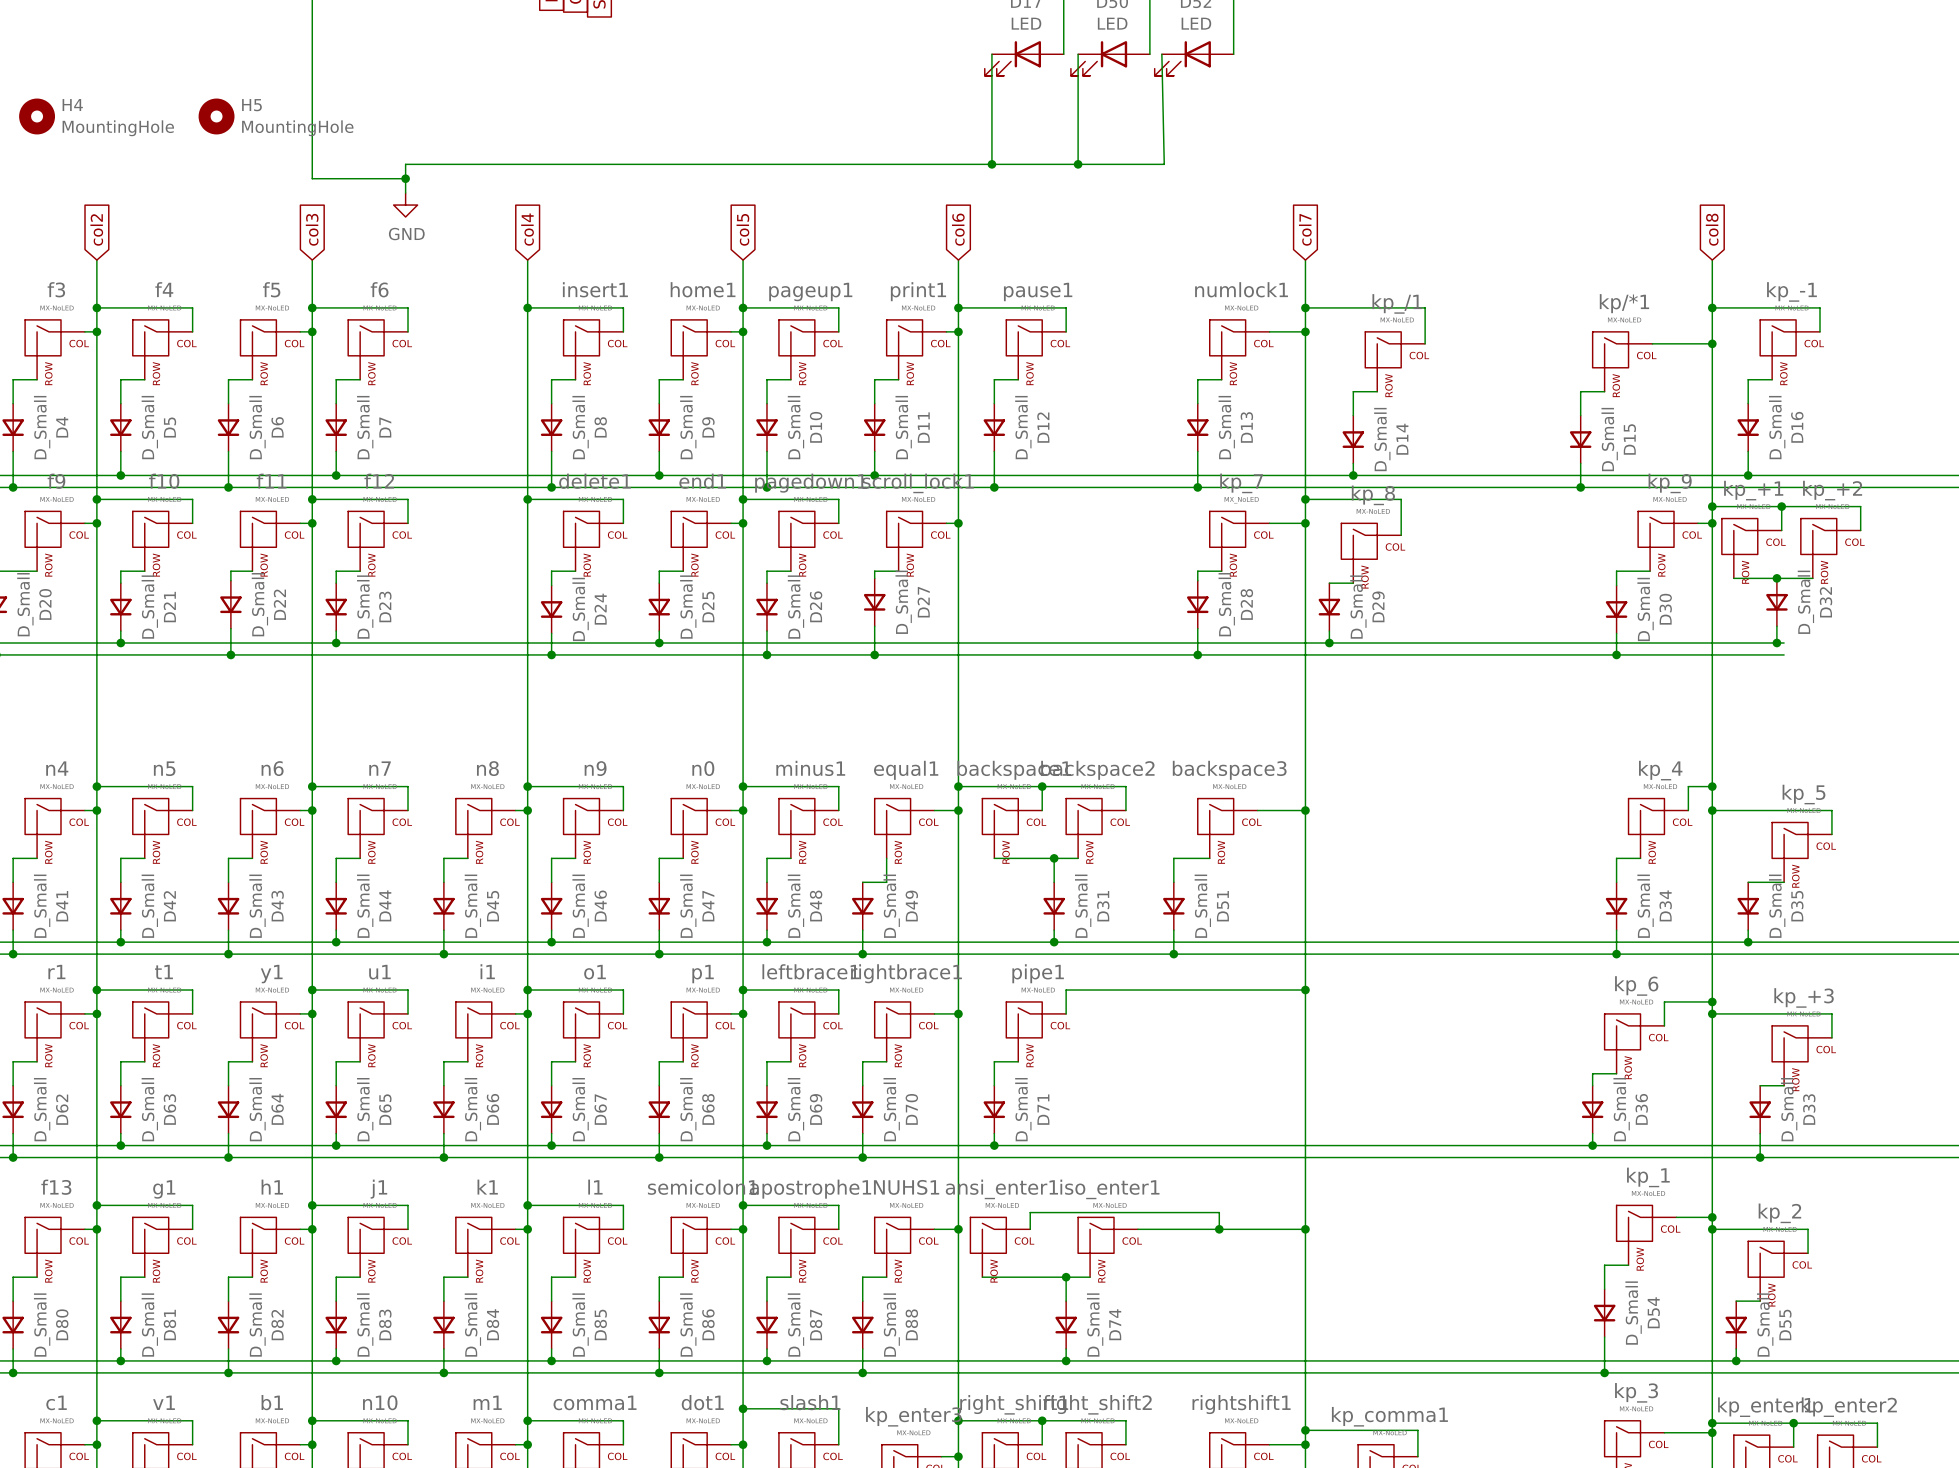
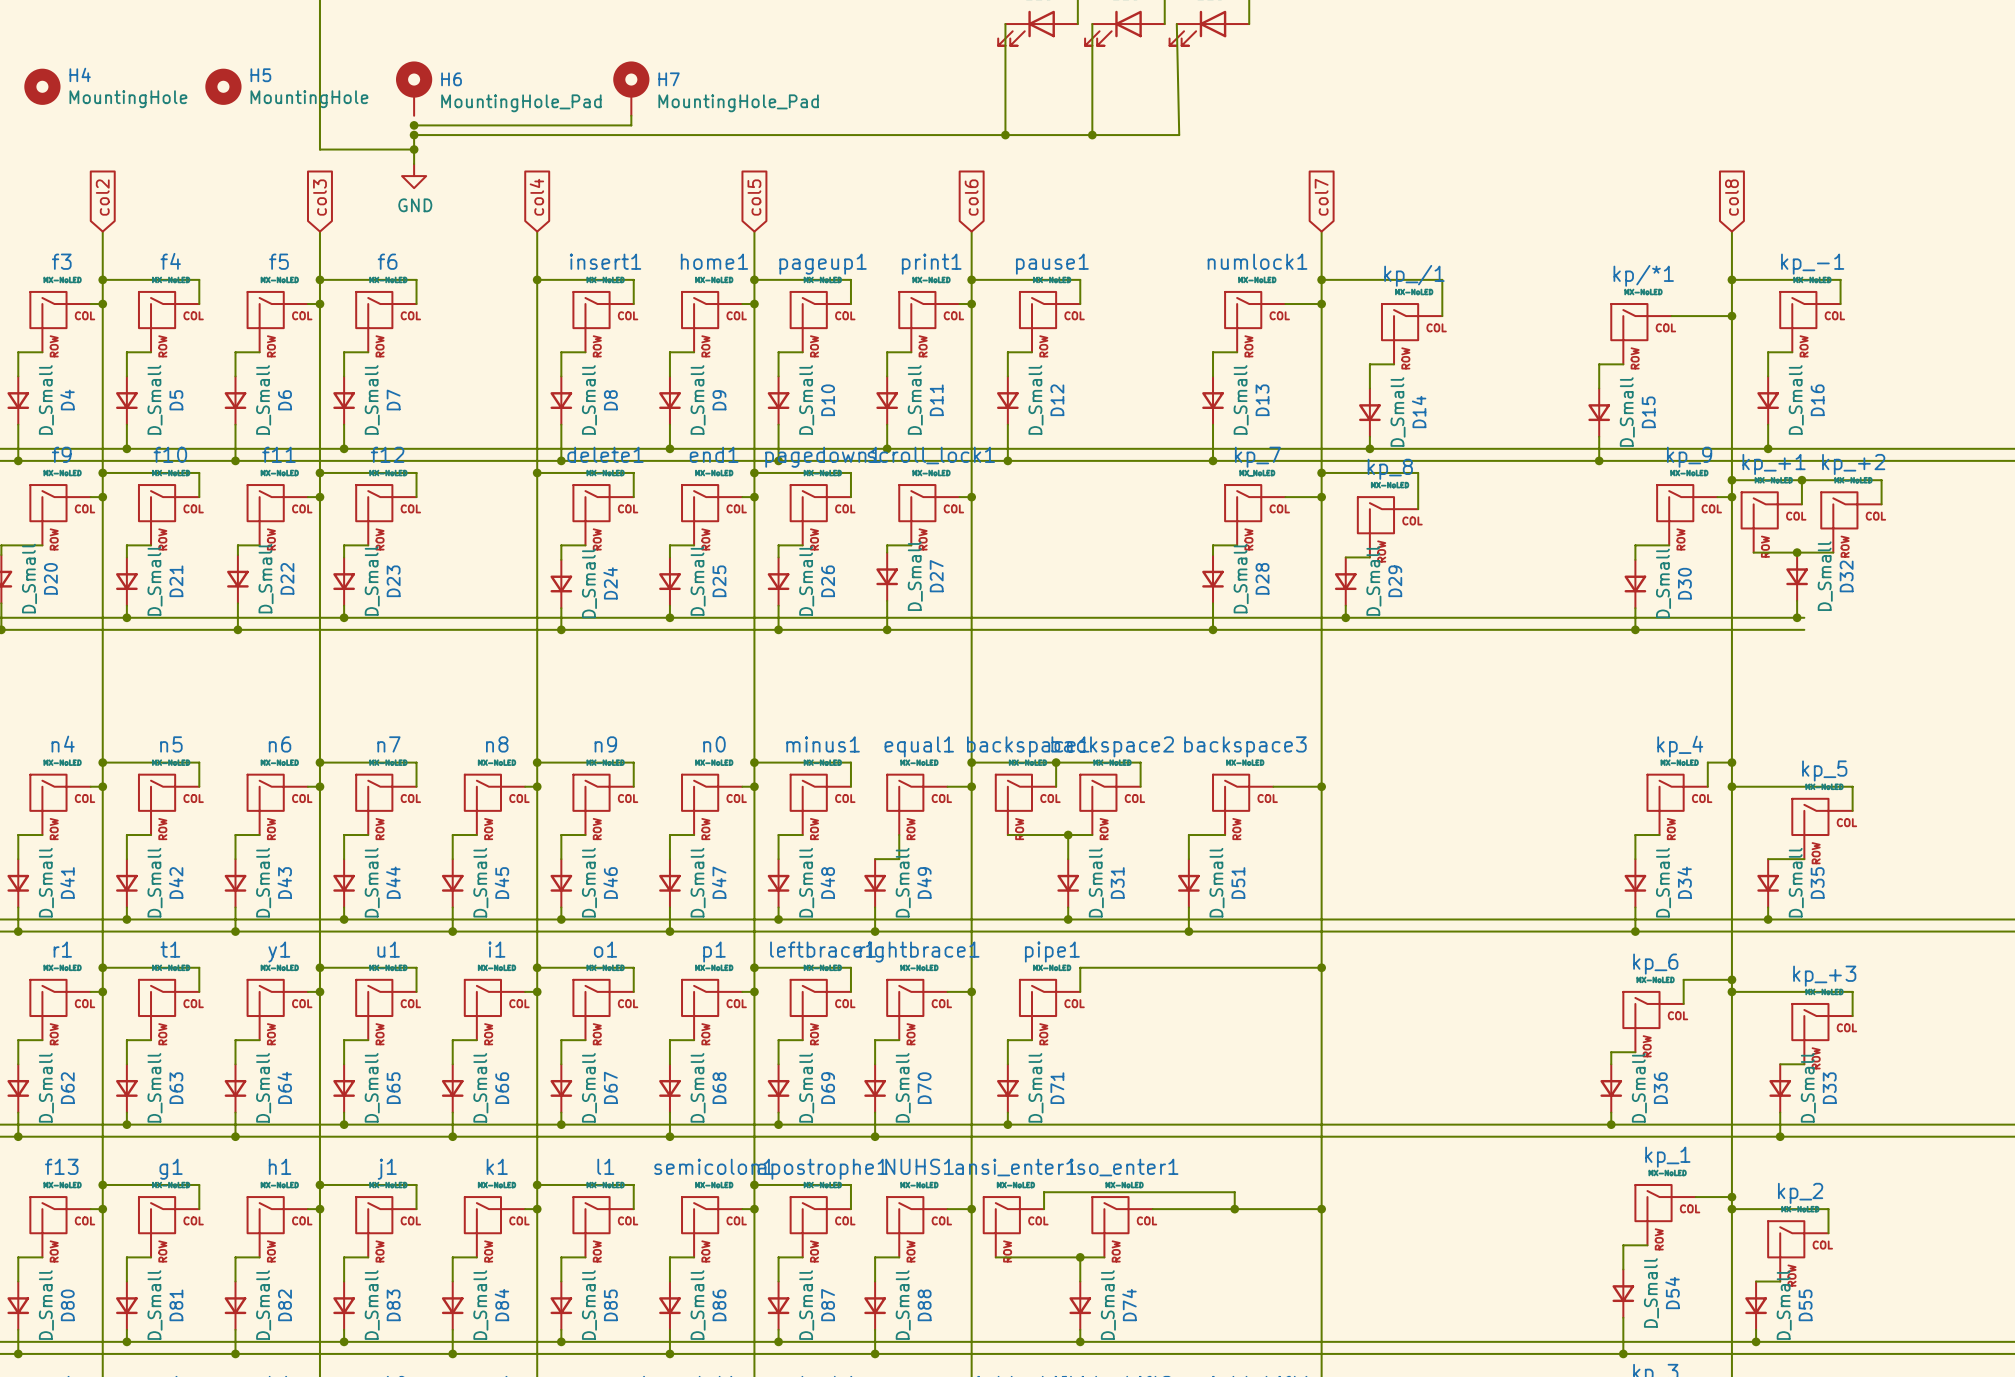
H6: none -> MountingHole_Pad (414, 88)
H7: none -> MountingHole_Pad (631, 88)
wire: none -> (631, 115) (631, 125) (414, 125)
junction: none -> (414, 125)
junction: none -> (414, 135)

